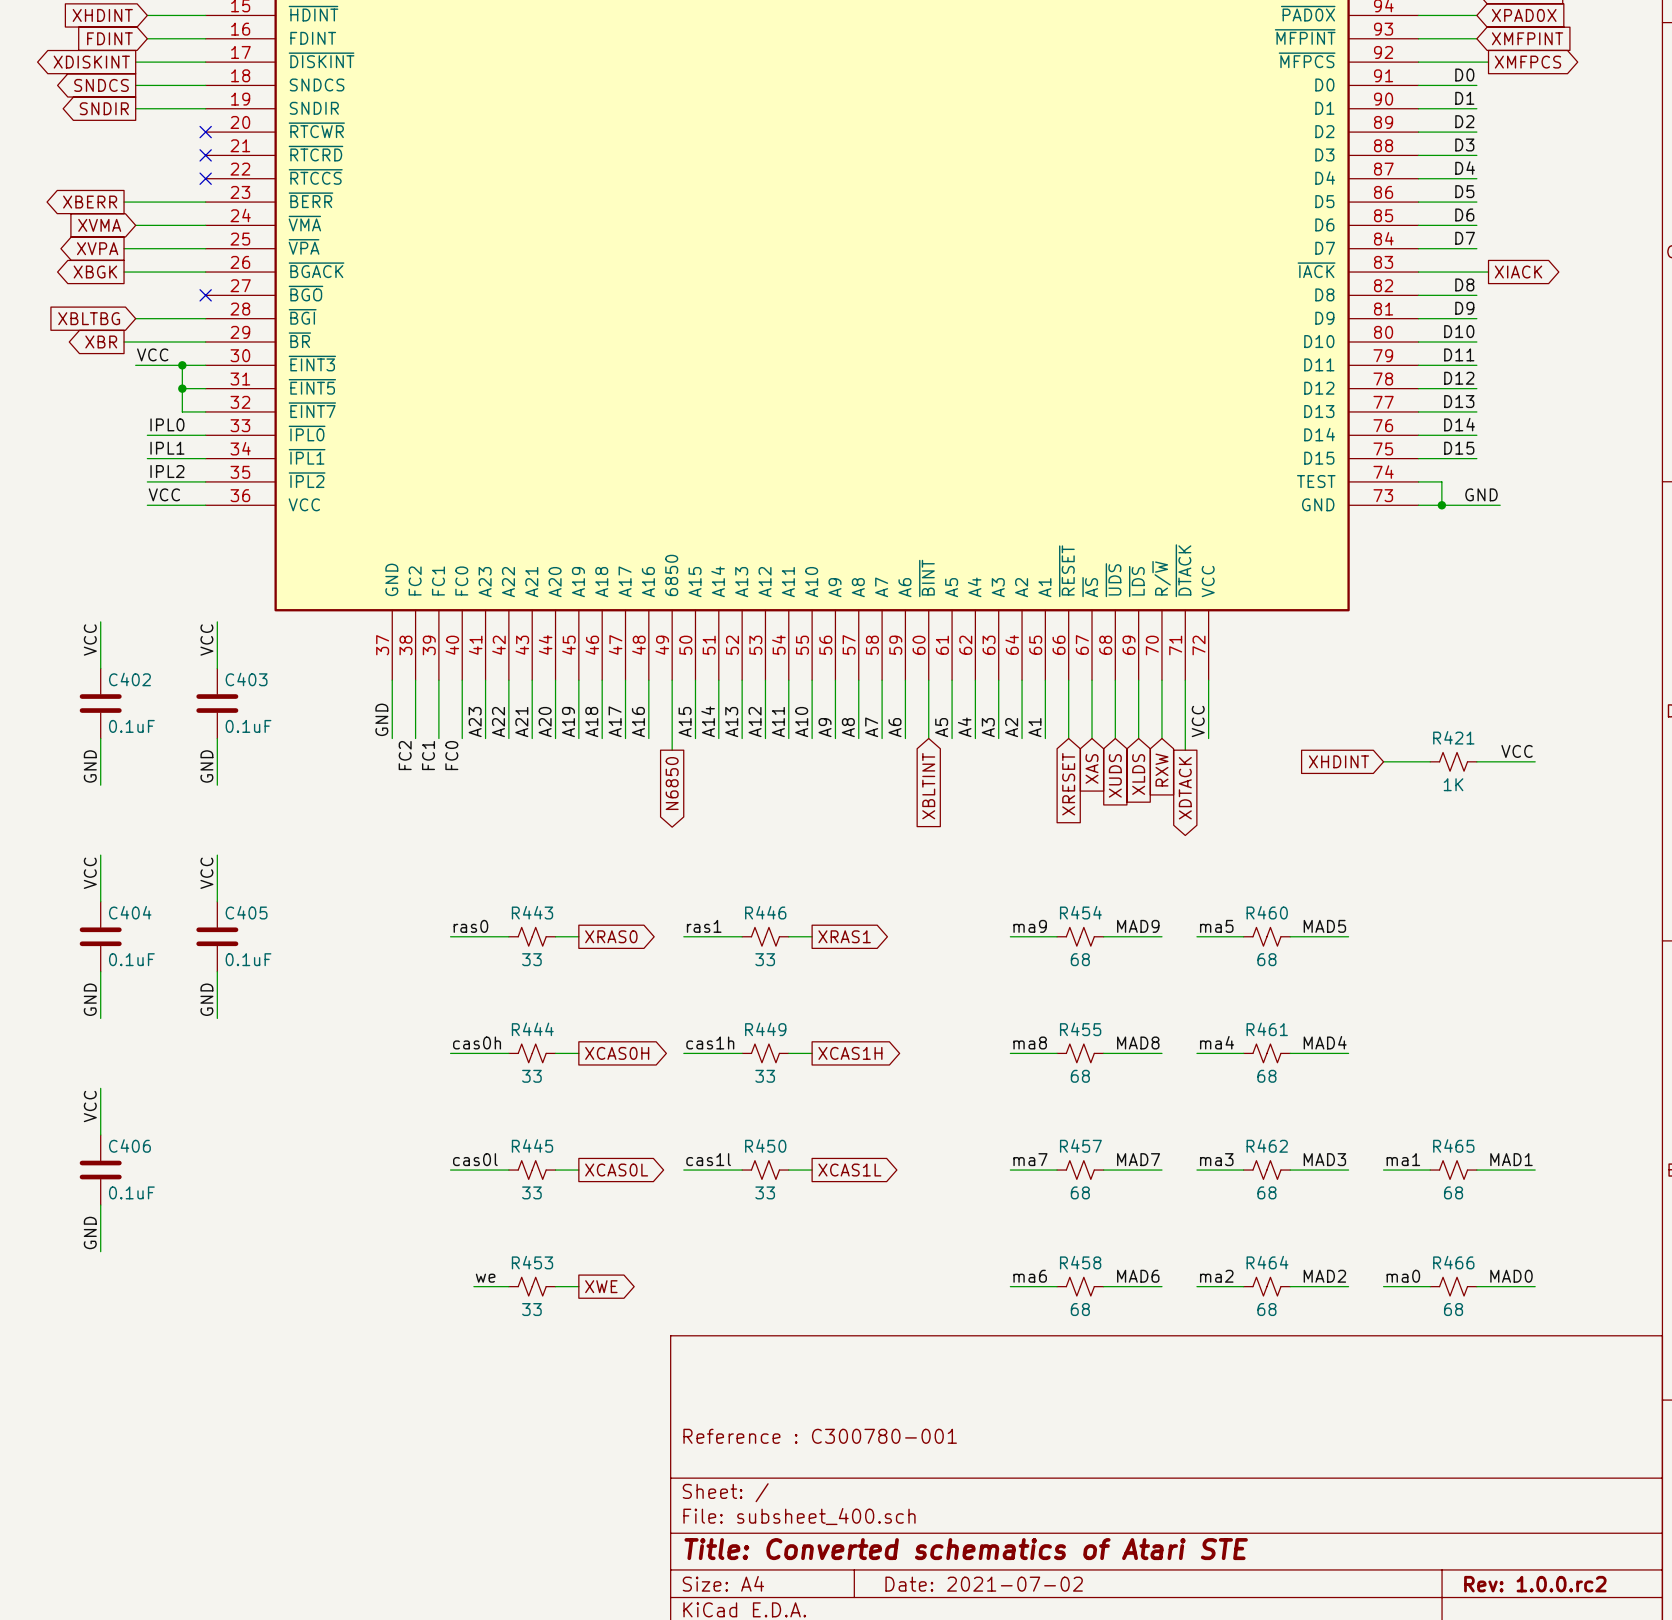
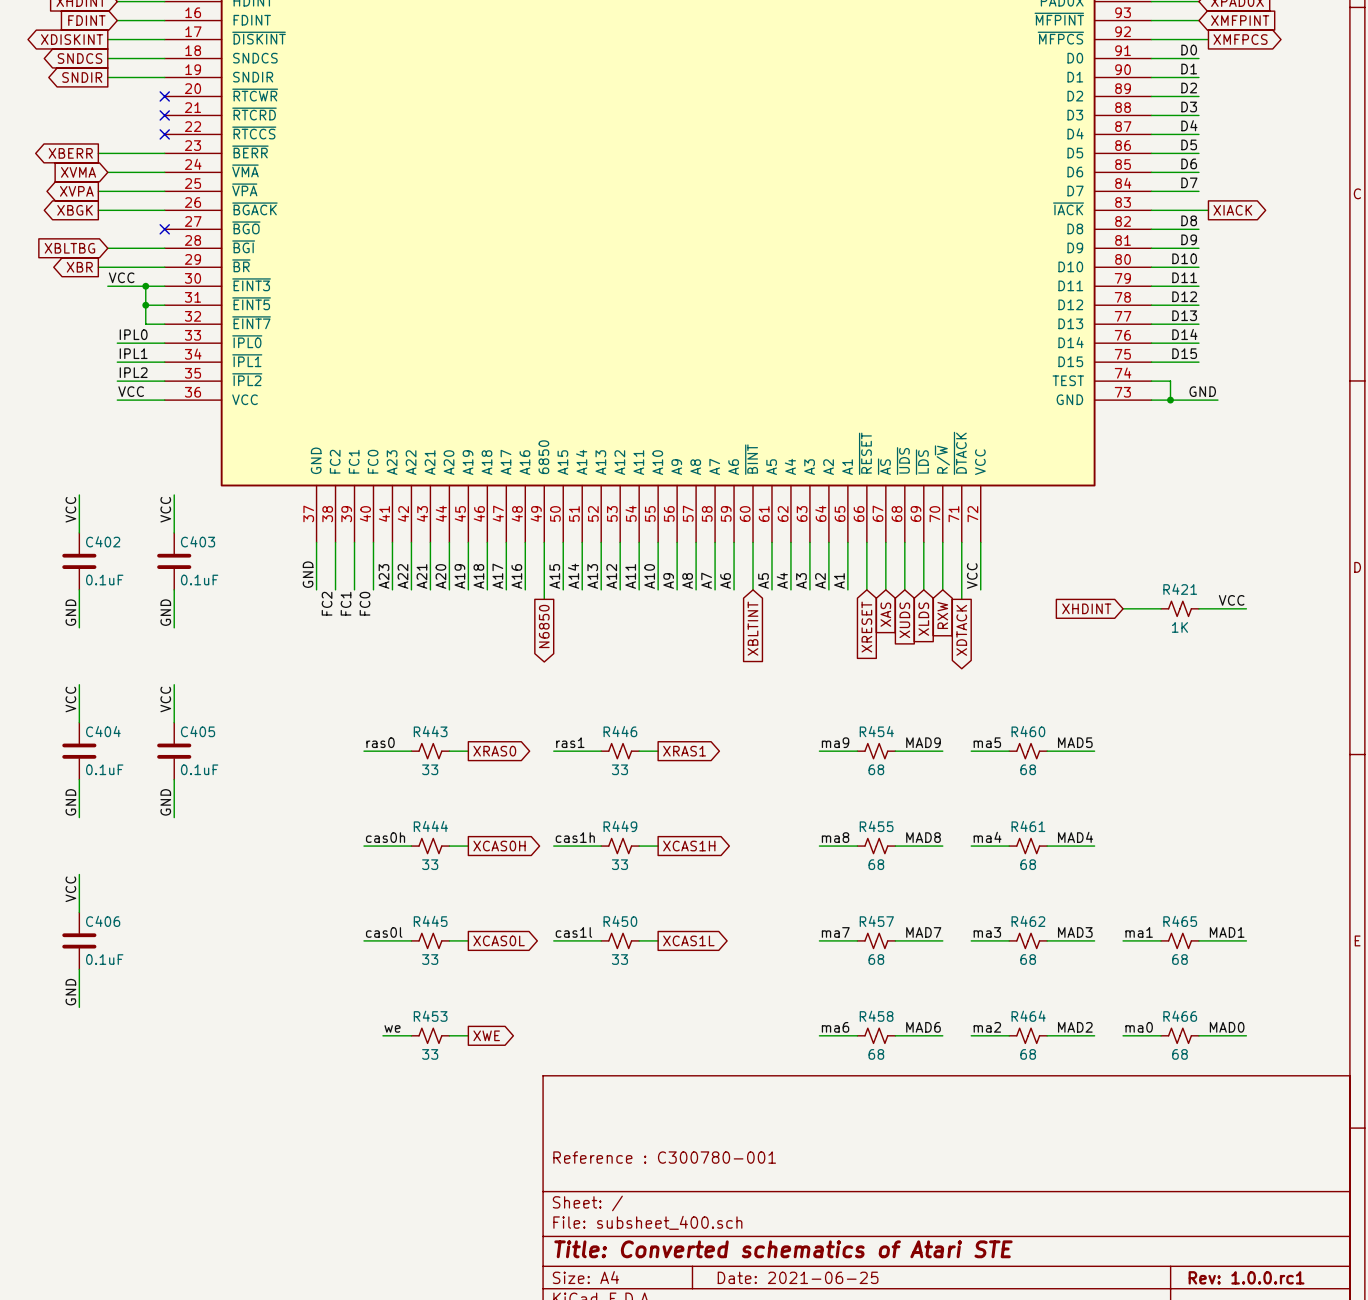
title block: Date: 2021-07-02 (984, 1584) -> Date: 2021-06-25 (798, 1277)
title block: Rev: 1.0.0.rc2 (1535, 1584) -> Rev: 1.0.0.rc1 (1246, 1277)

